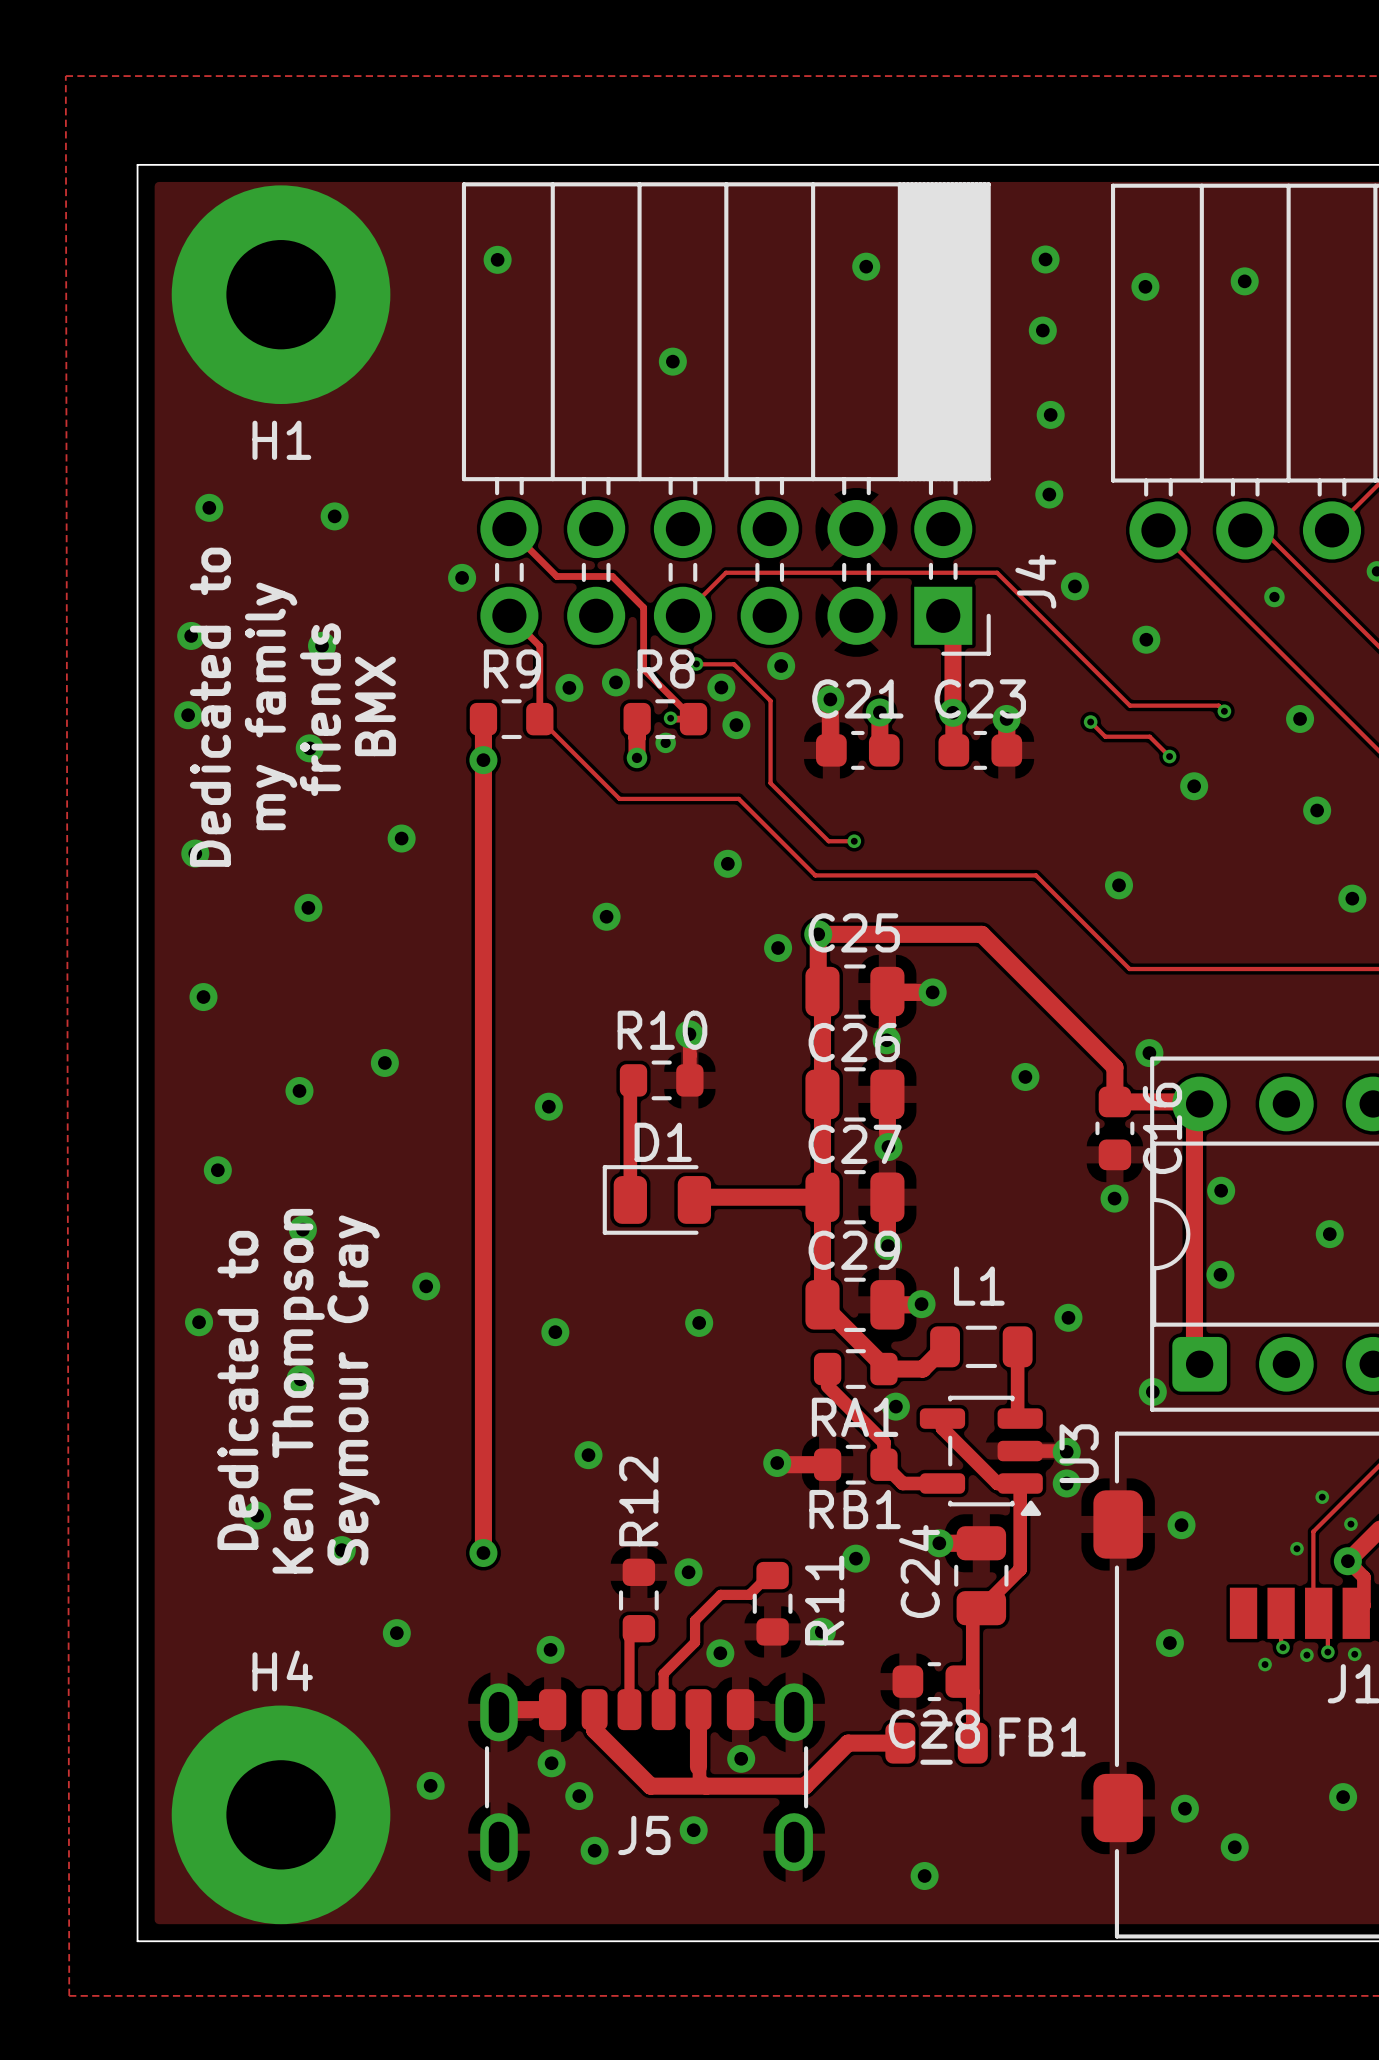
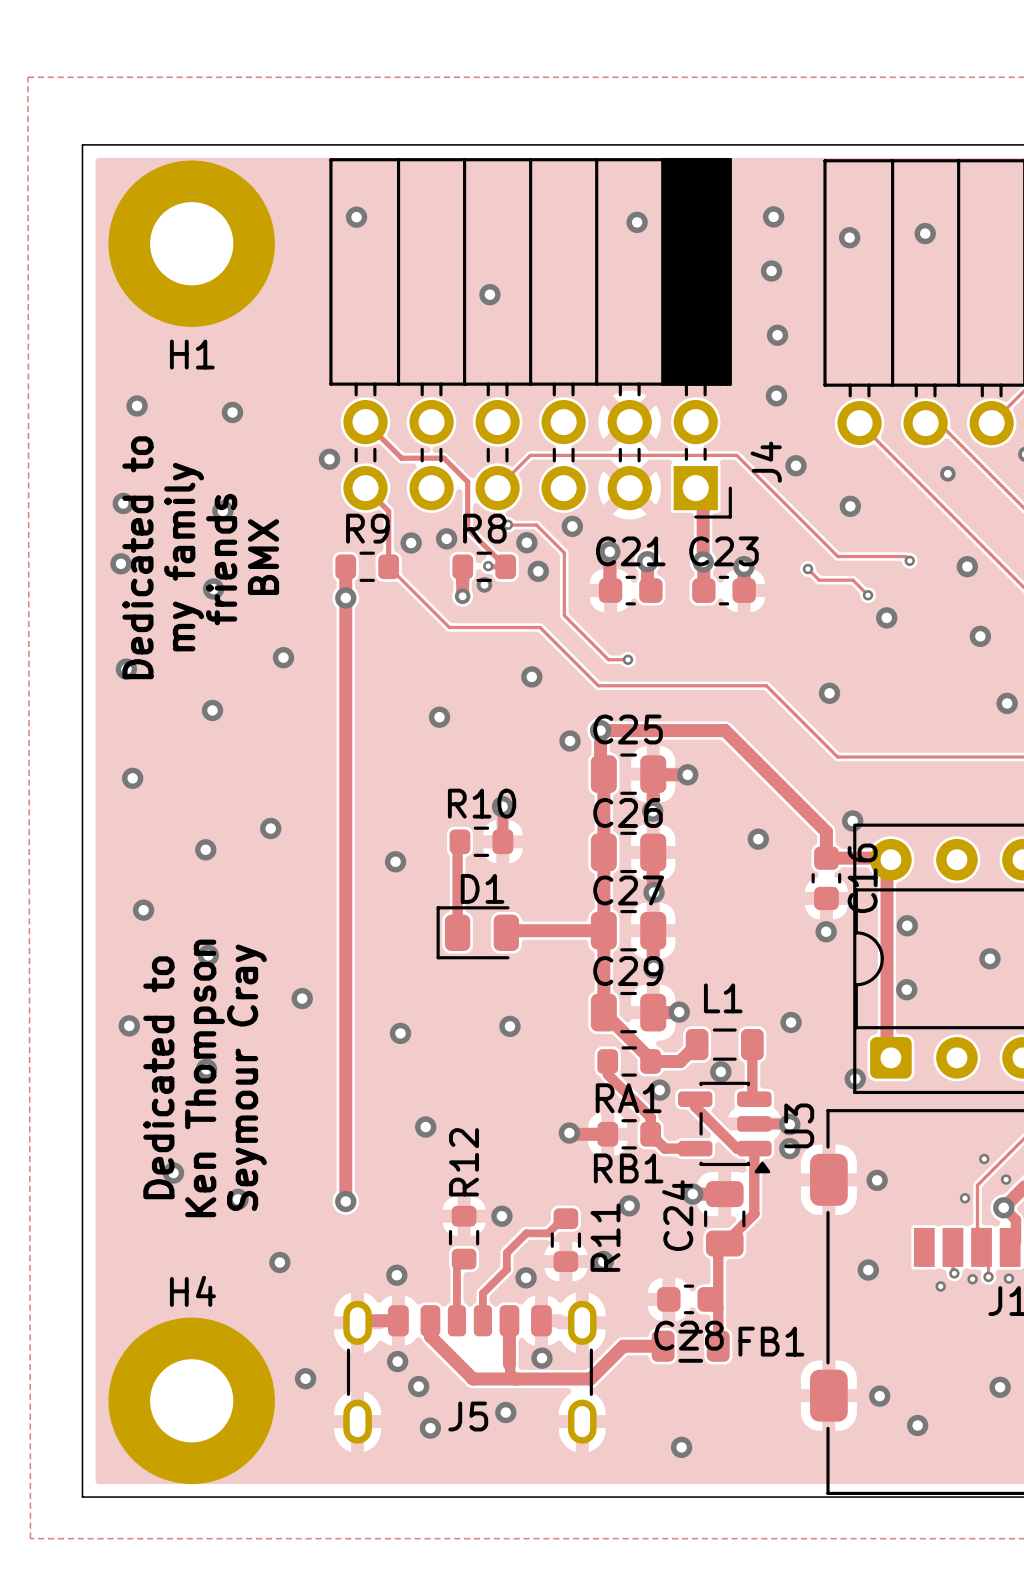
via: none -> (720, 1071)

